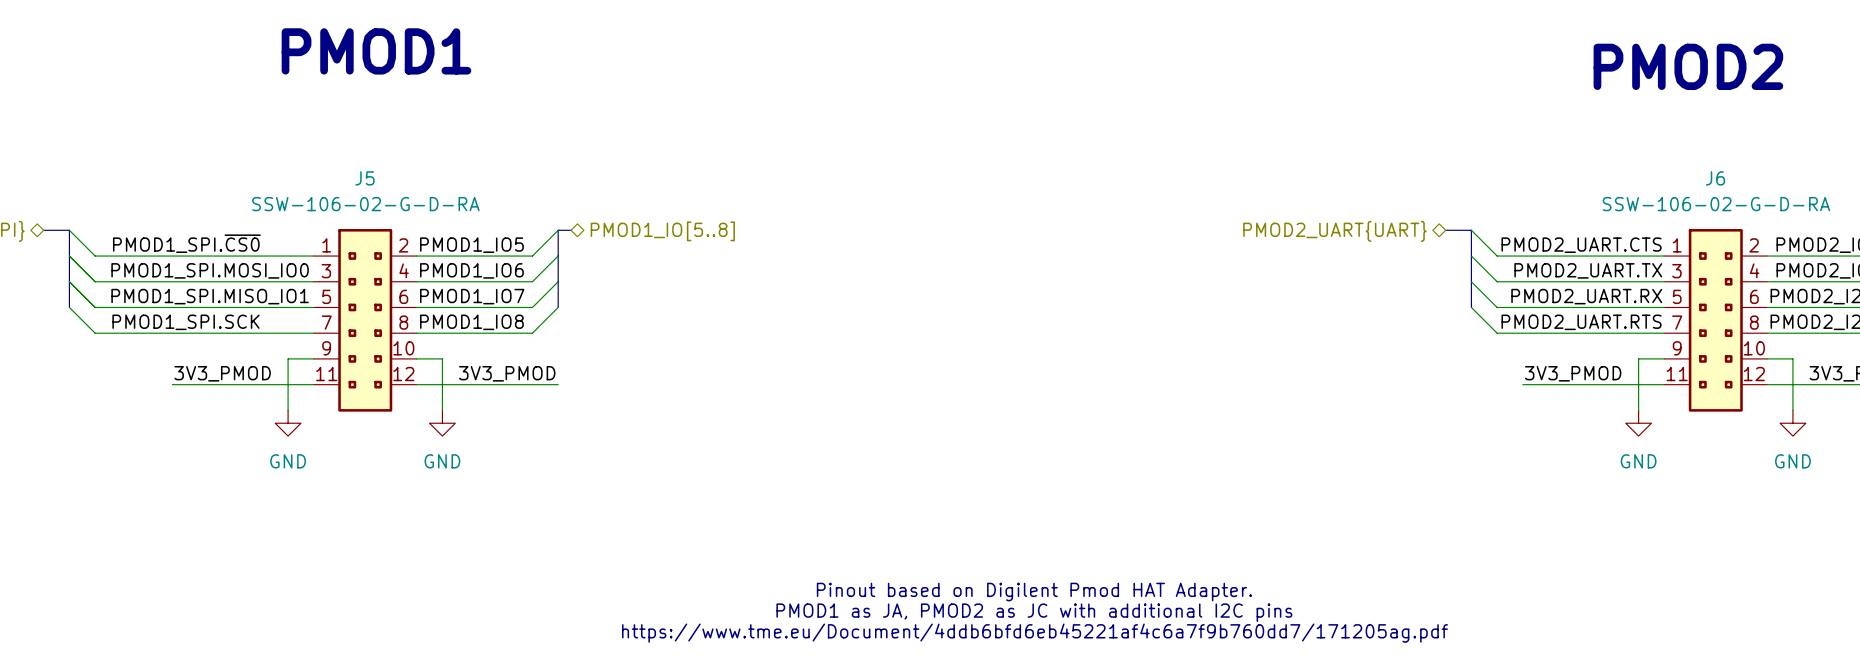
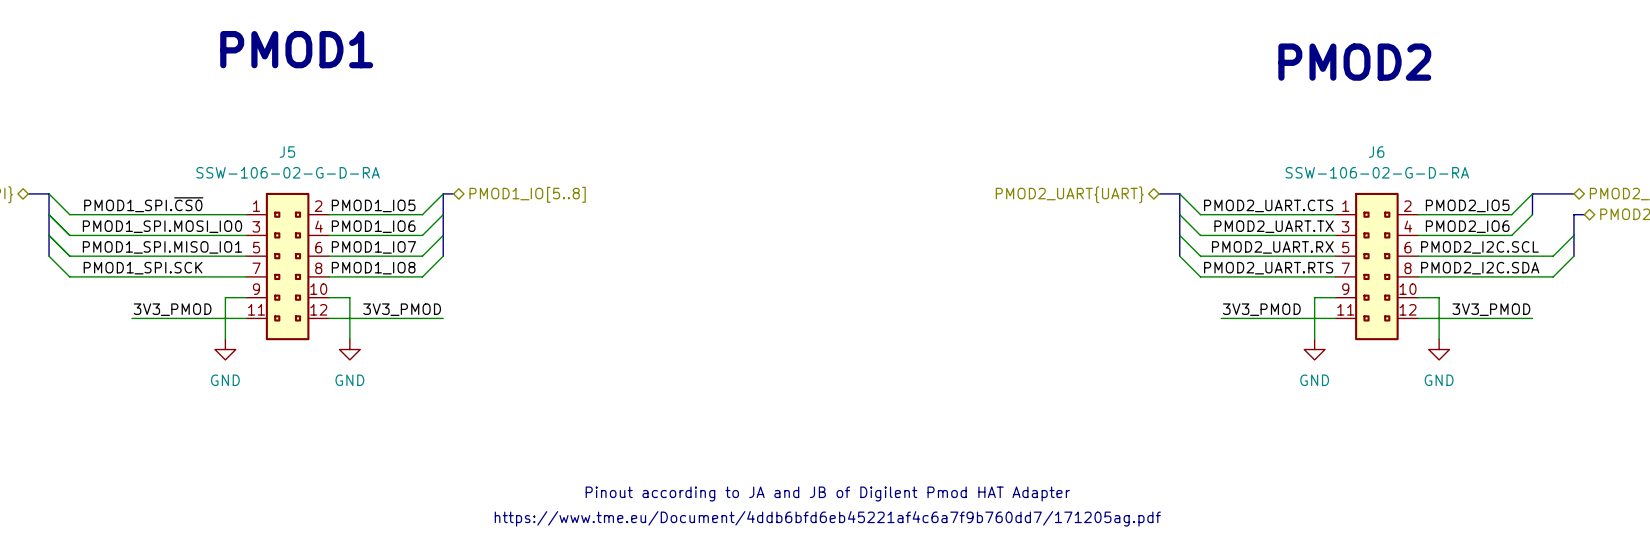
text: Pinout based on Digilent Pmod HAT Adapter. (1034, 592) -> Pinout according to JA and JB of Digilent Pmod HAT Adapter (827, 494)
text: PMOD1 as JA, PMOD2 as JC with additional I2C pins (1034, 612) -> none

